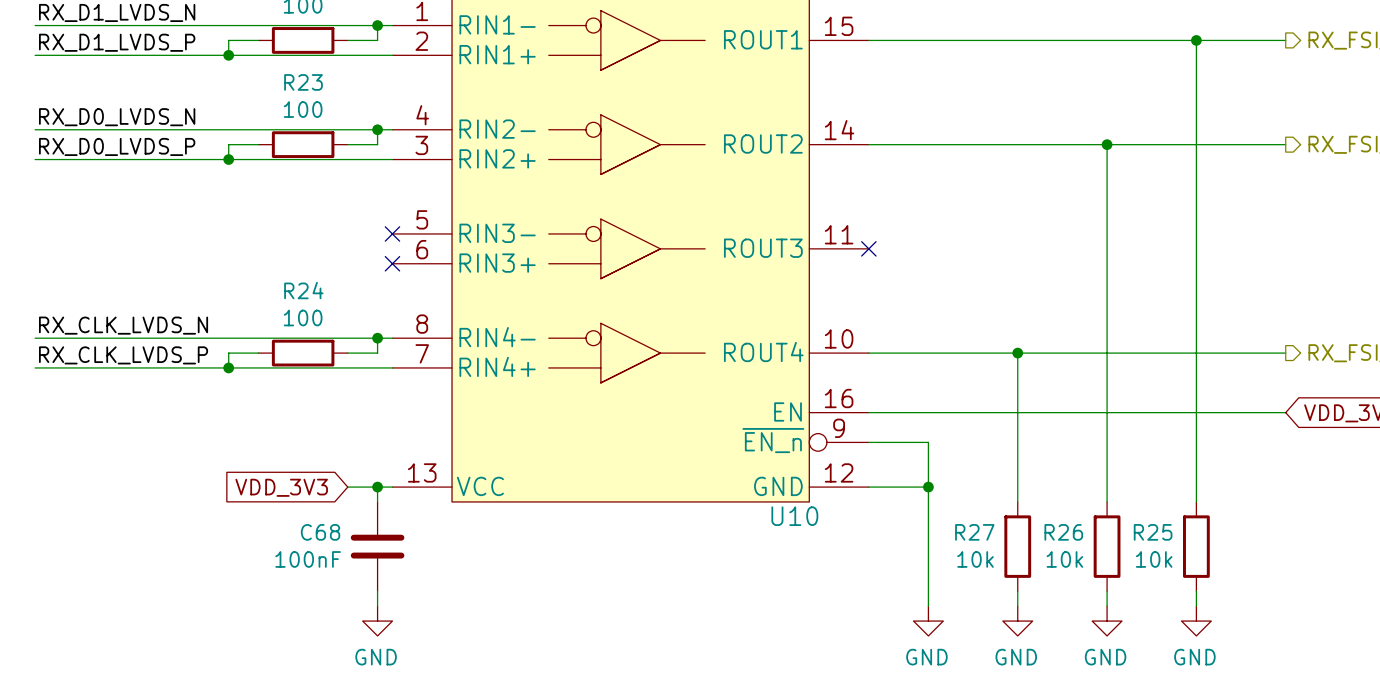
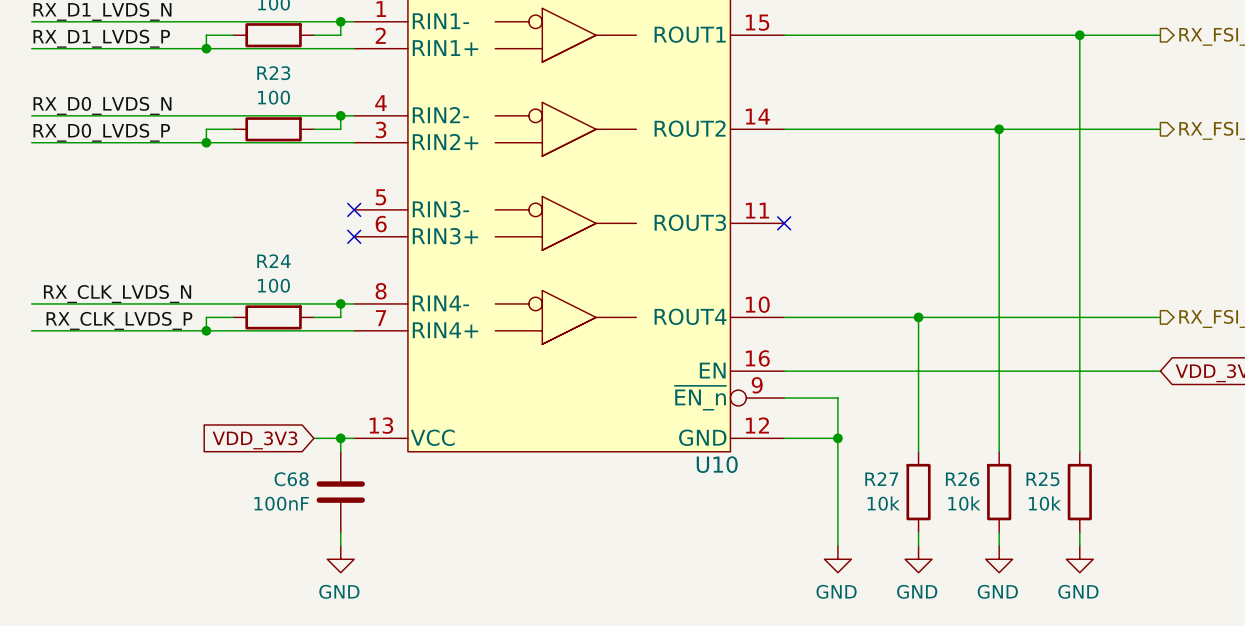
label position: RX_CLK_LVDS_N (123, 325) -> RX_CLK_LVDS_N (117, 294)
label position: RX_CLK_LVDS_P (123, 355) -> RX_CLK_LVDS_P (119, 320)

